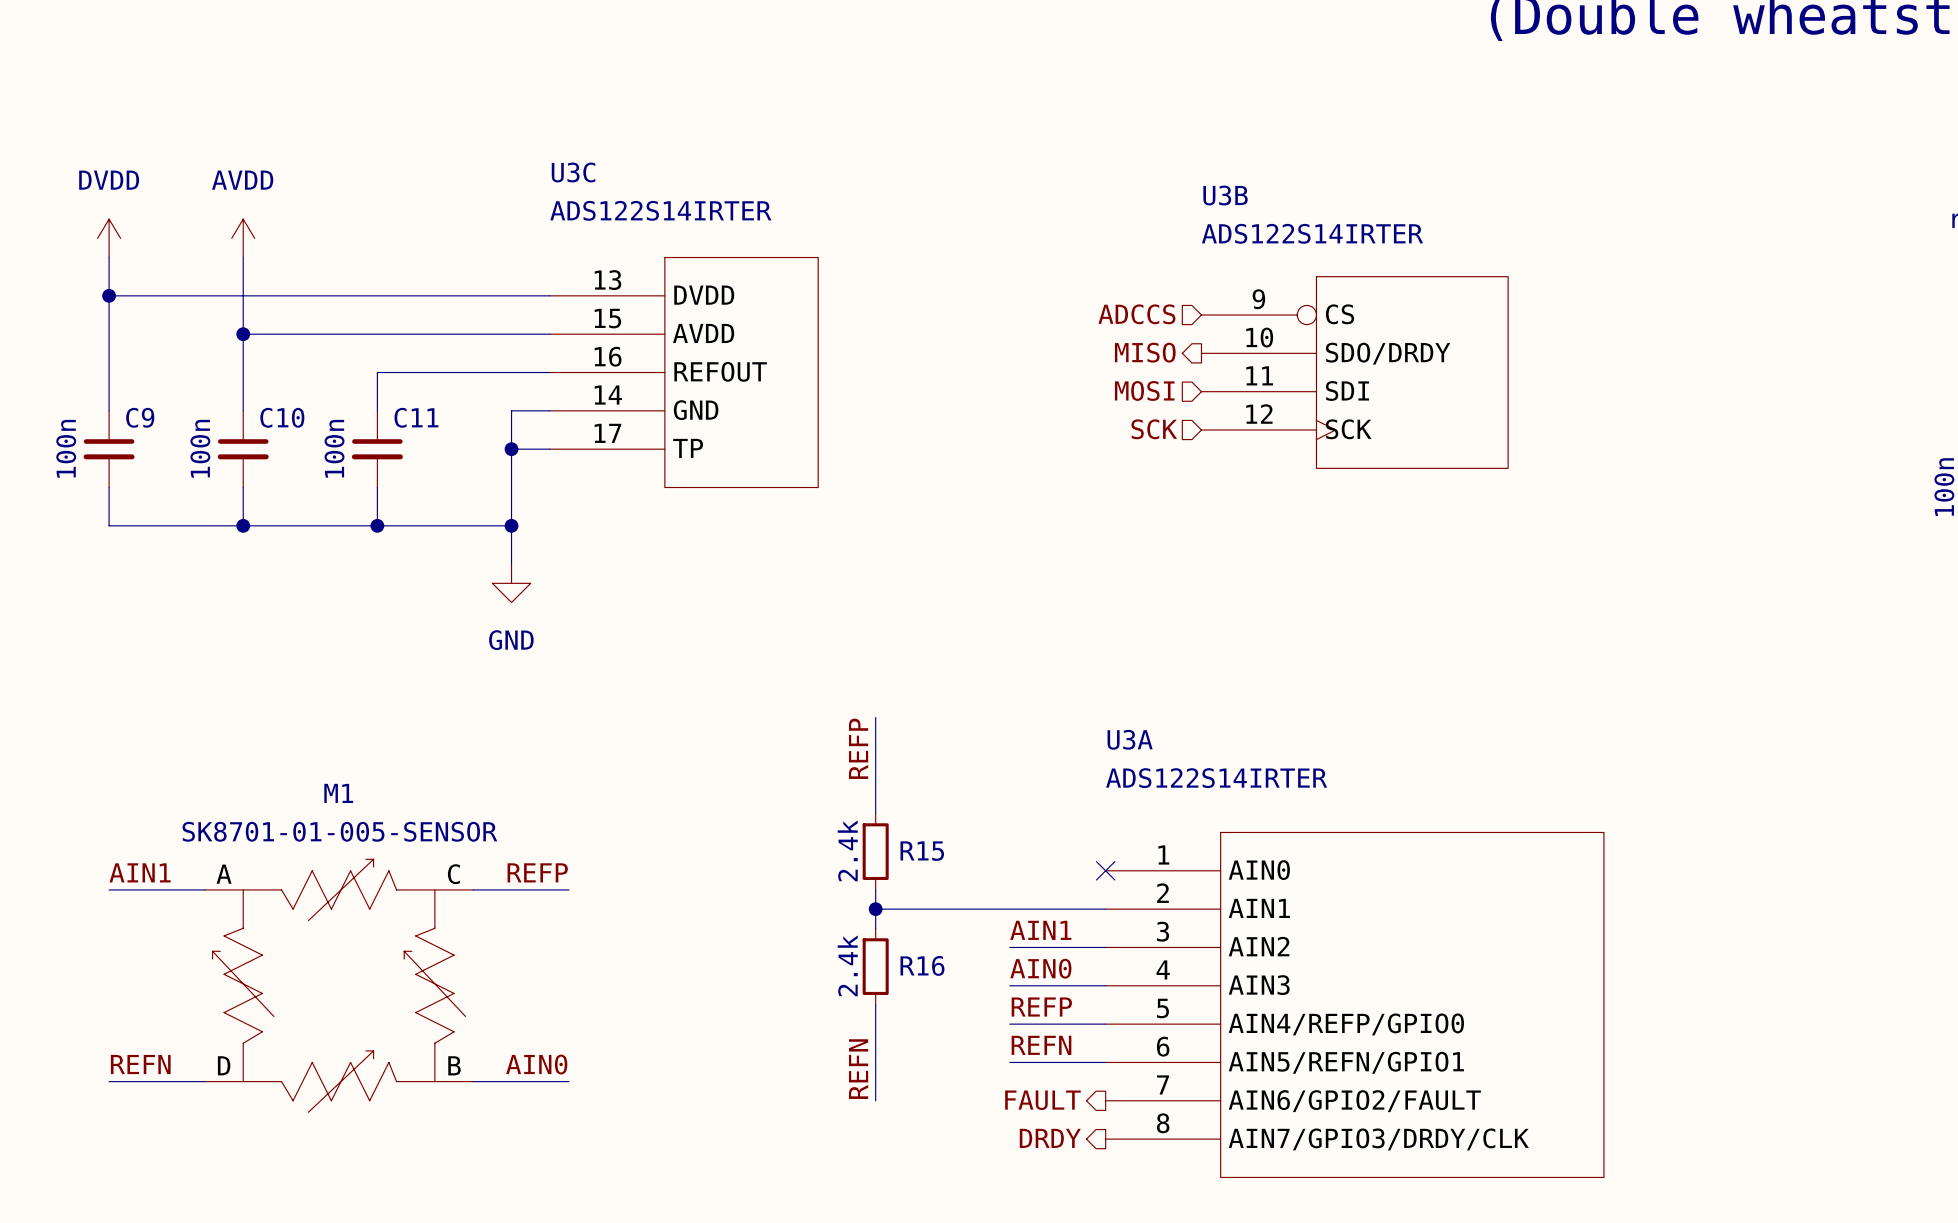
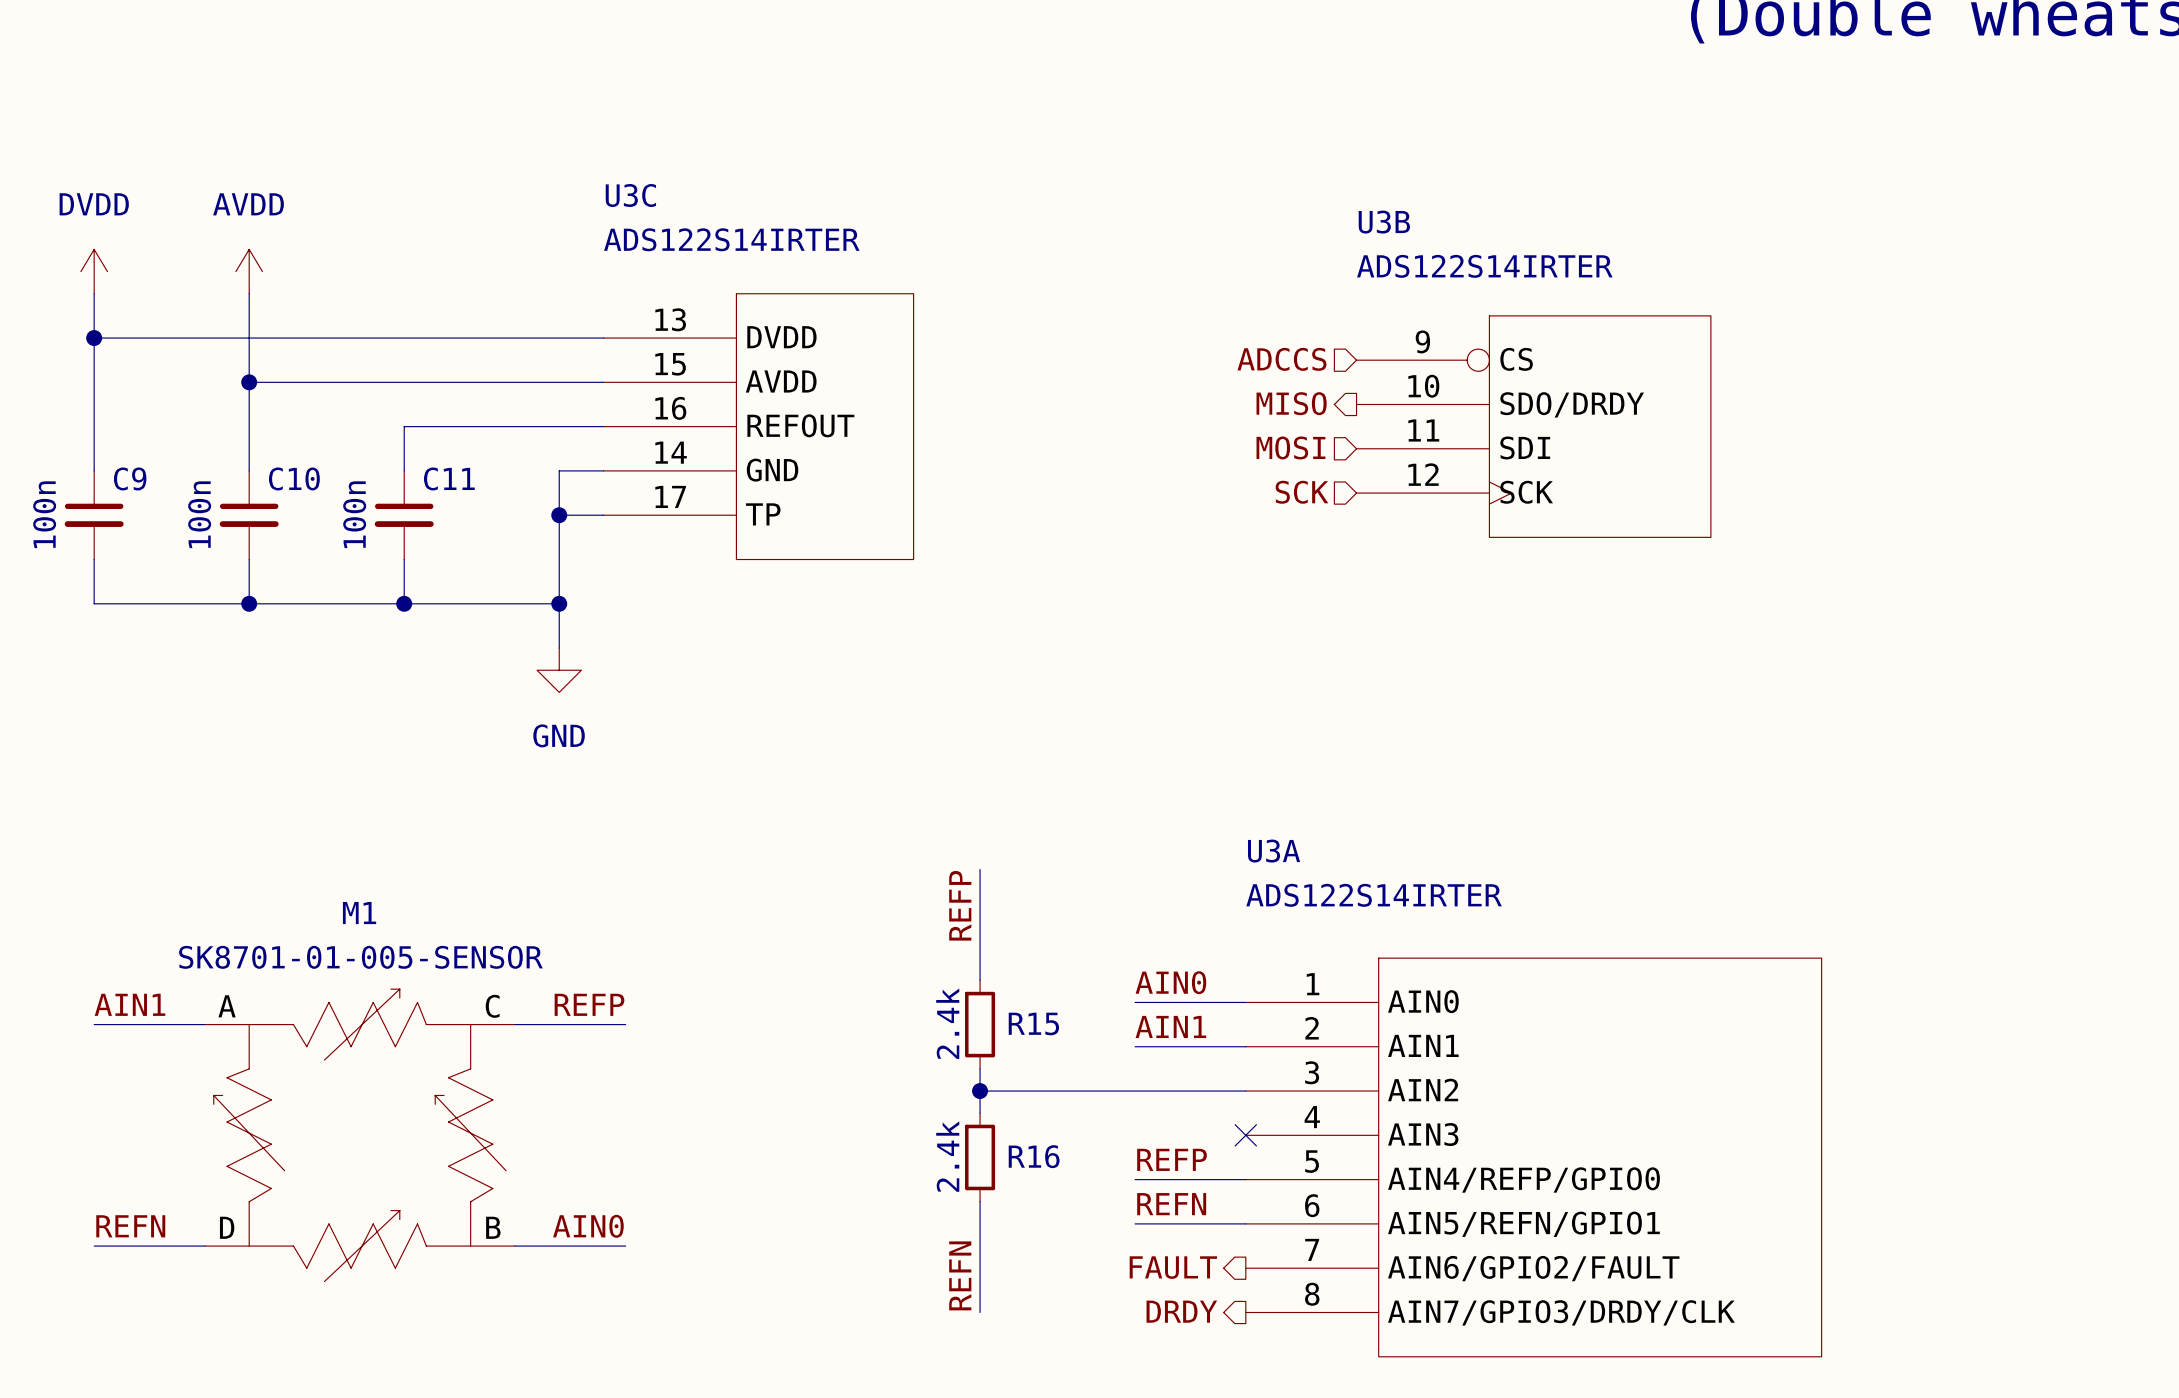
wire: (875, 717) (875, 755) -> (980, 936) (980, 980)
label position: REFP (858, 748) -> REFP (960, 905)
R15 position: (875, 851) -> (980, 1024)
no-connect mark: (1105, 870) -> none
wire: (875, 889) (875, 928) -> (980, 1113) (980, 1068)
wire: (875, 909) (1009, 909) -> (980, 1091) (1135, 1091)
junction position: (875, 909) -> (980, 1091)
label position: AIN1 (1040, 930) -> AIN1 (1170, 1026)
R16 position: (875, 966) -> (980, 1157)
label position: AIN0 (1040, 968) -> AIN0 (1170, 982)
wire: (1009, 985) (1105, 985) -> (1135, 1002) (1245, 1002)
no-connect mark: none -> (1245, 1135)
wire: (875, 1004) (875, 1043) -> (980, 1268) (980, 1312)
label position: REFN (858, 1069) -> REFN (960, 1275)

